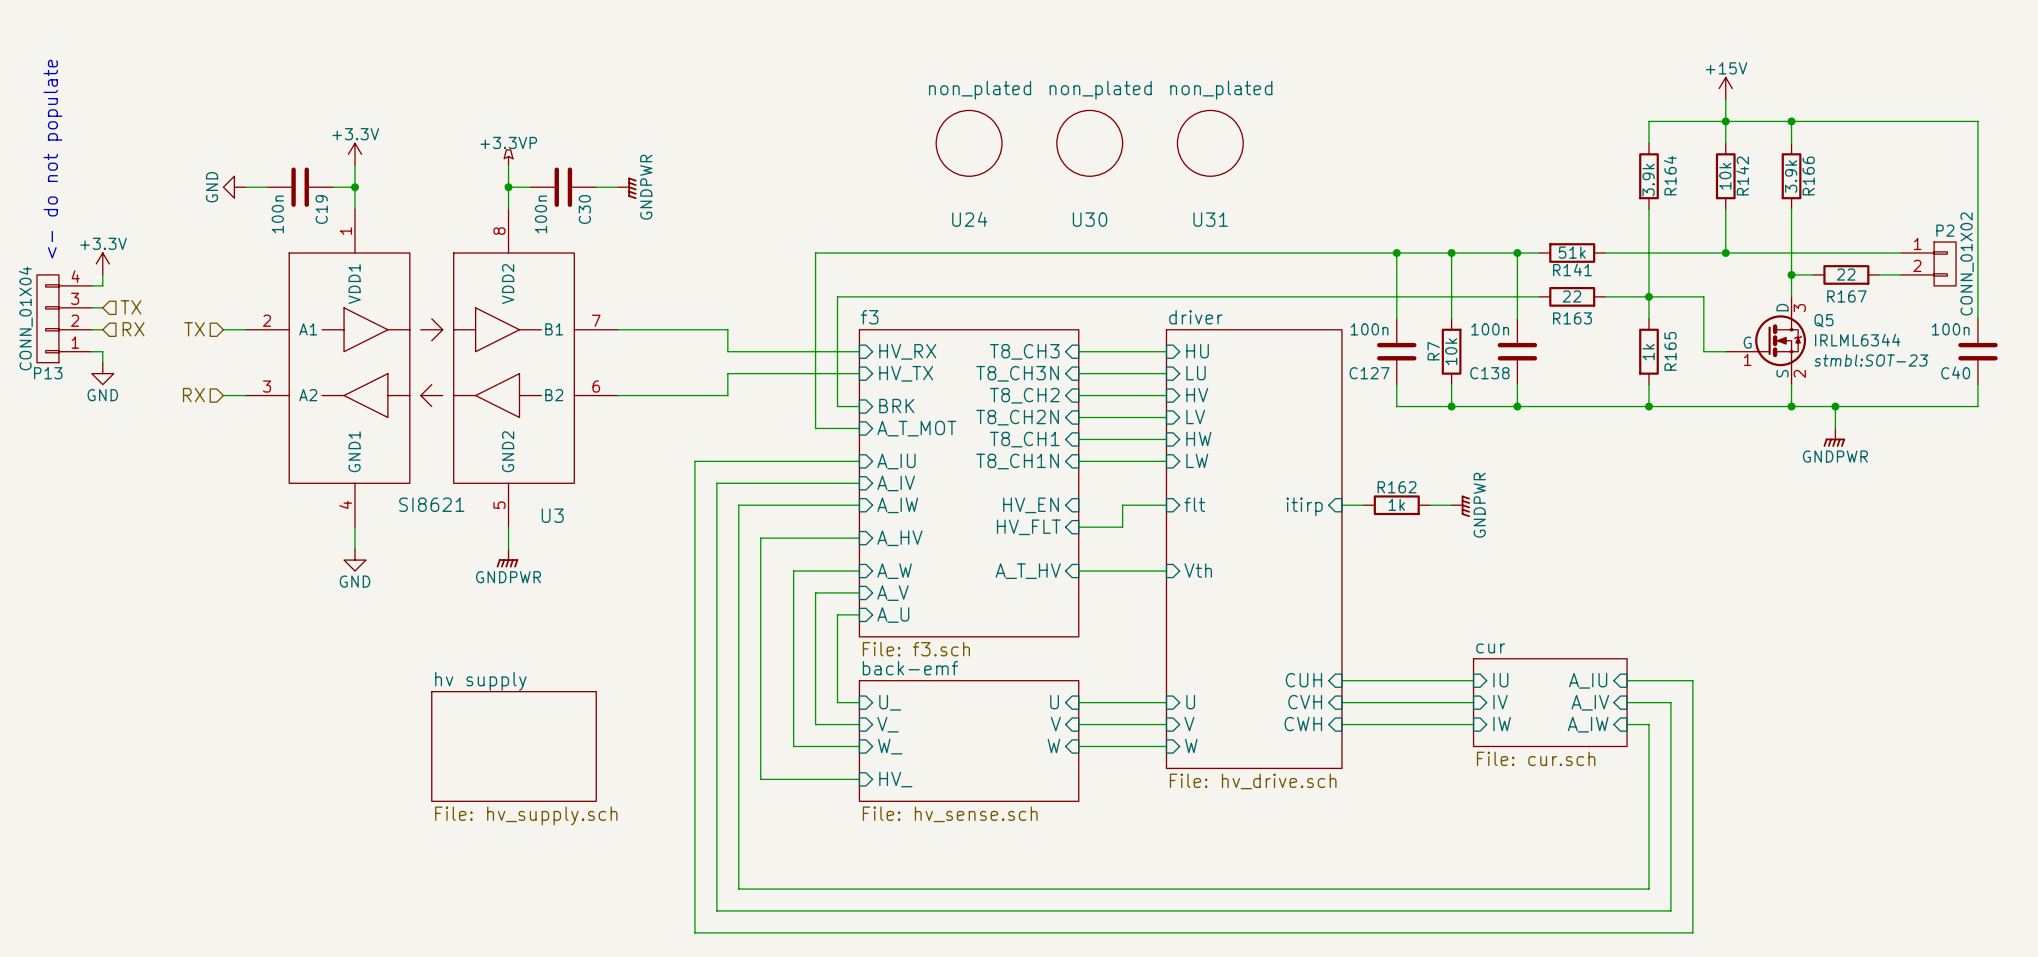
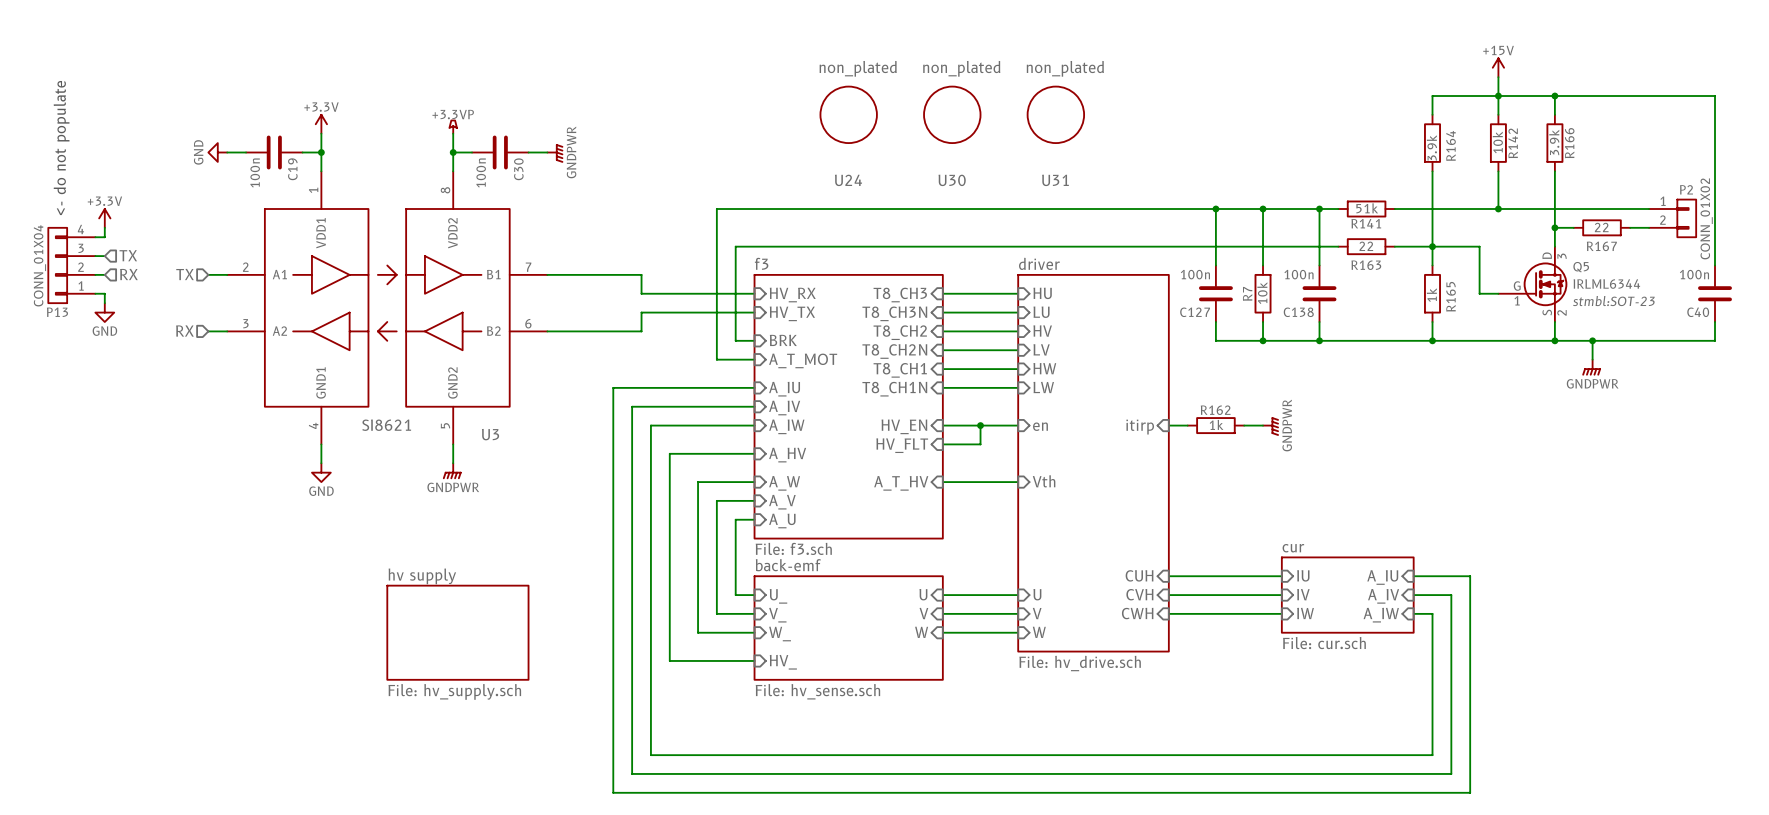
sheet pin: flt (1194, 504) -> en (1040, 426)
wire: none -> (942, 425) (980, 425)
junction: none -> (980, 425)

